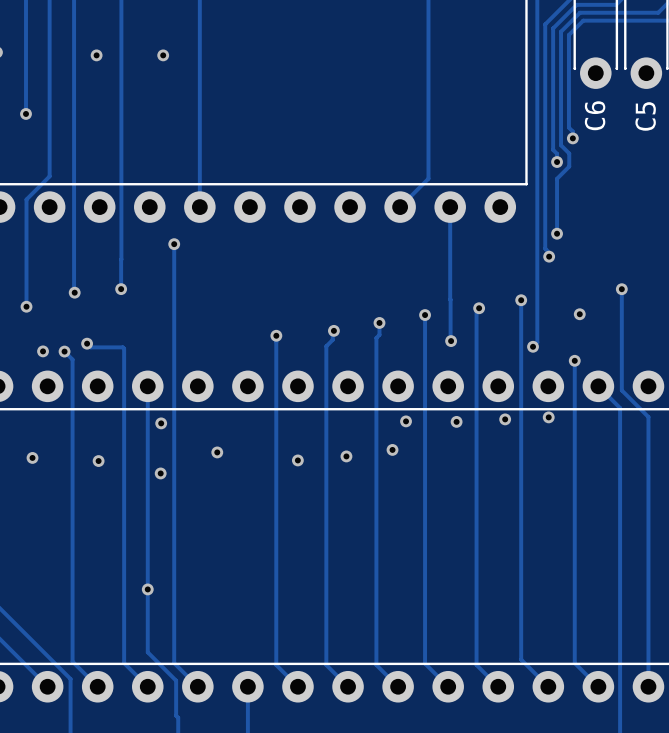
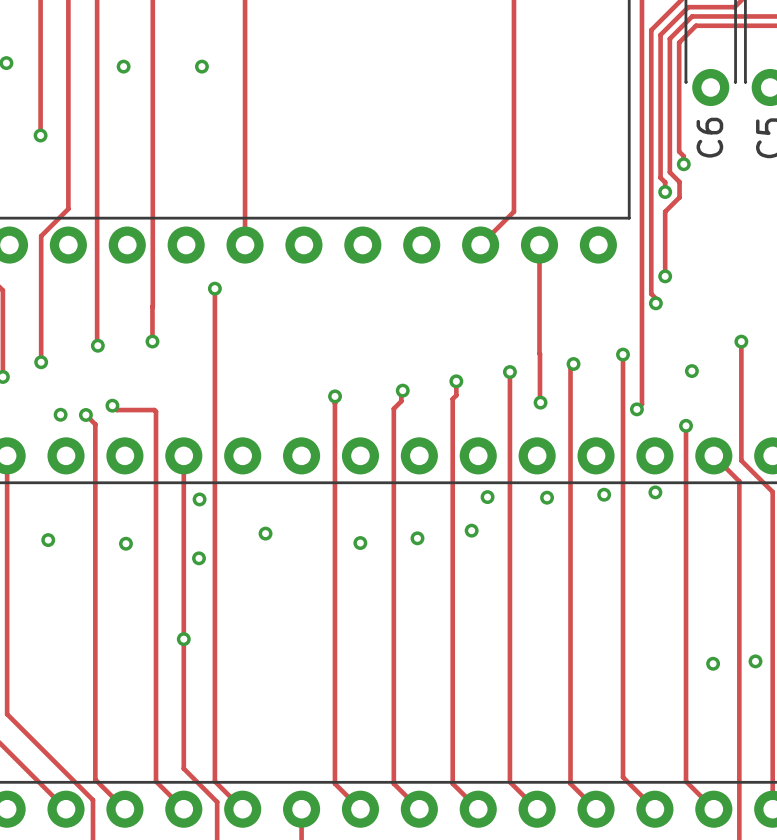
via: none -> (755, 661)
via: none -> (713, 663)
via position: (147, 589) -> (183, 639)

